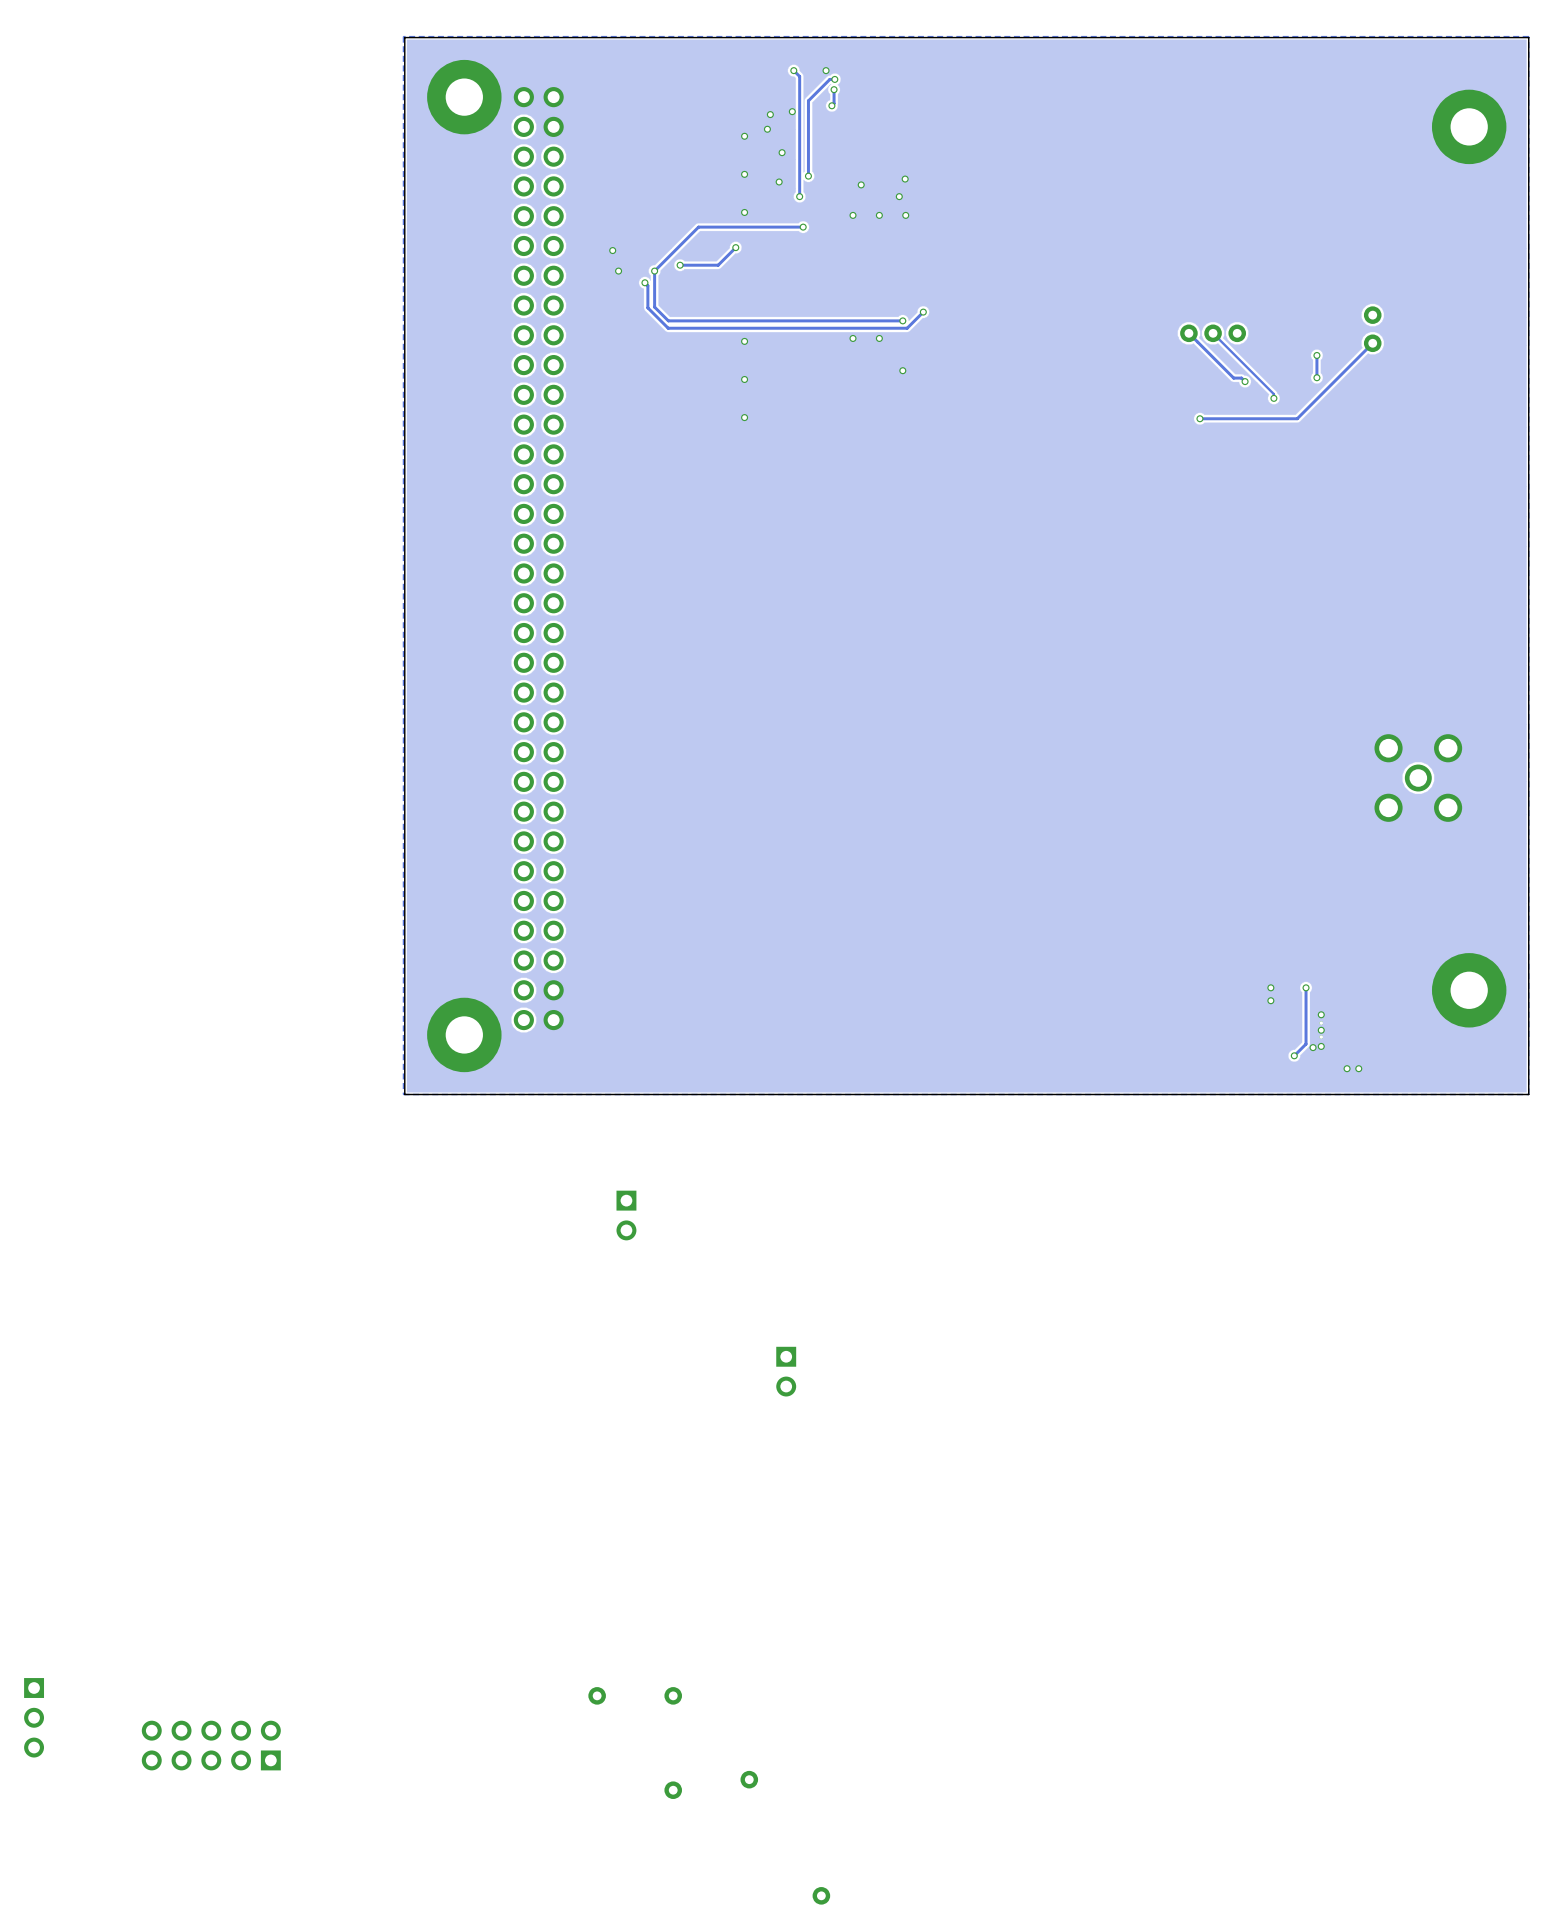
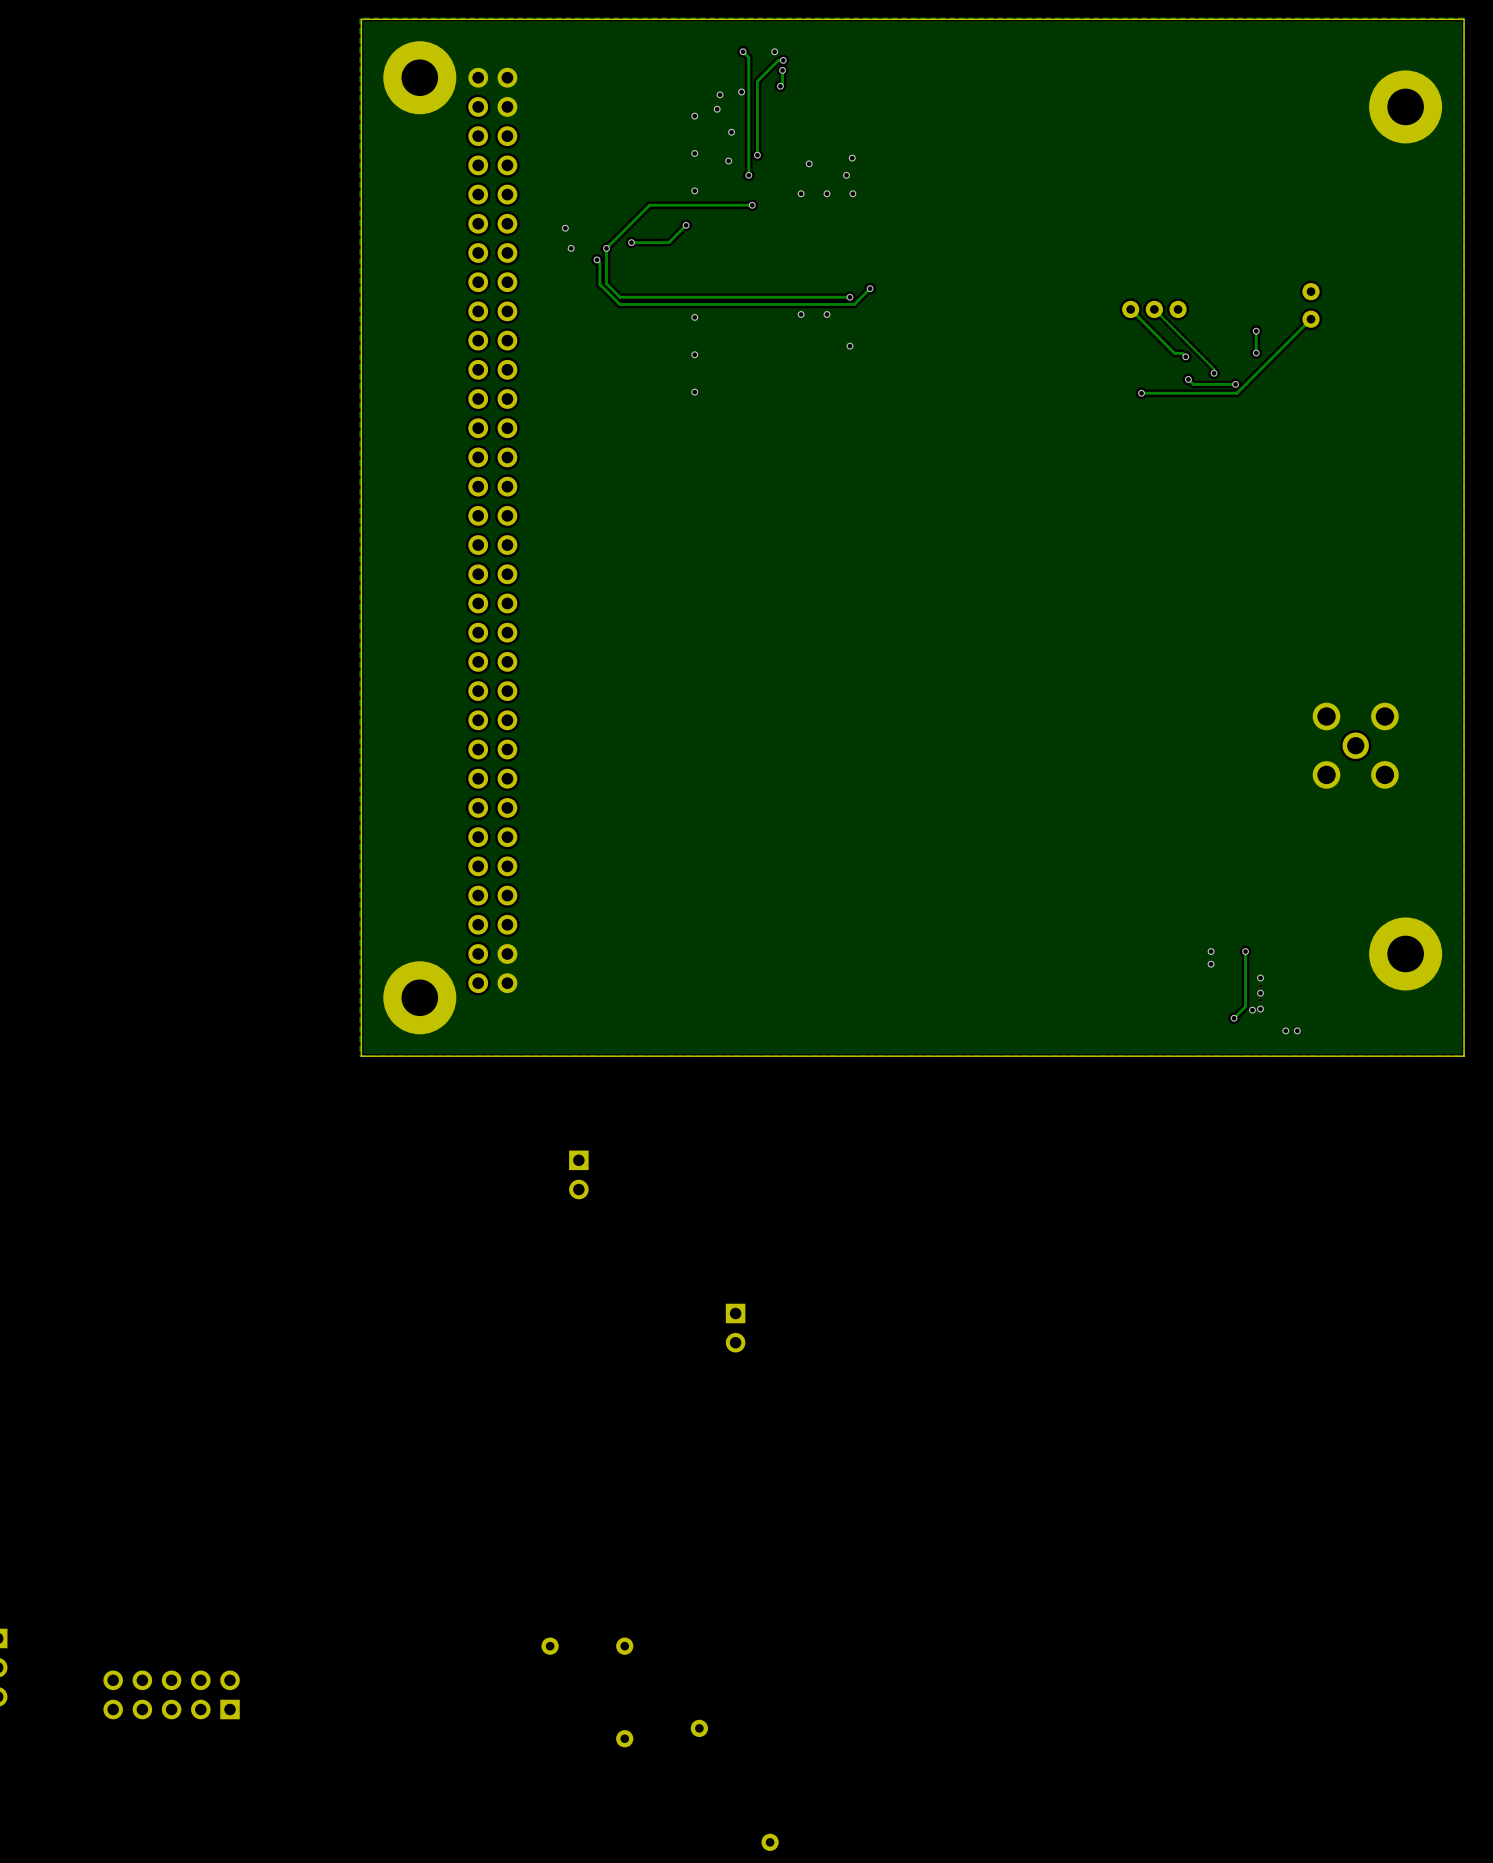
track: none -> (1188, 379) (1193, 384) (1235, 384)
via: none -> (1188, 379)
via: none -> (1235, 384)

